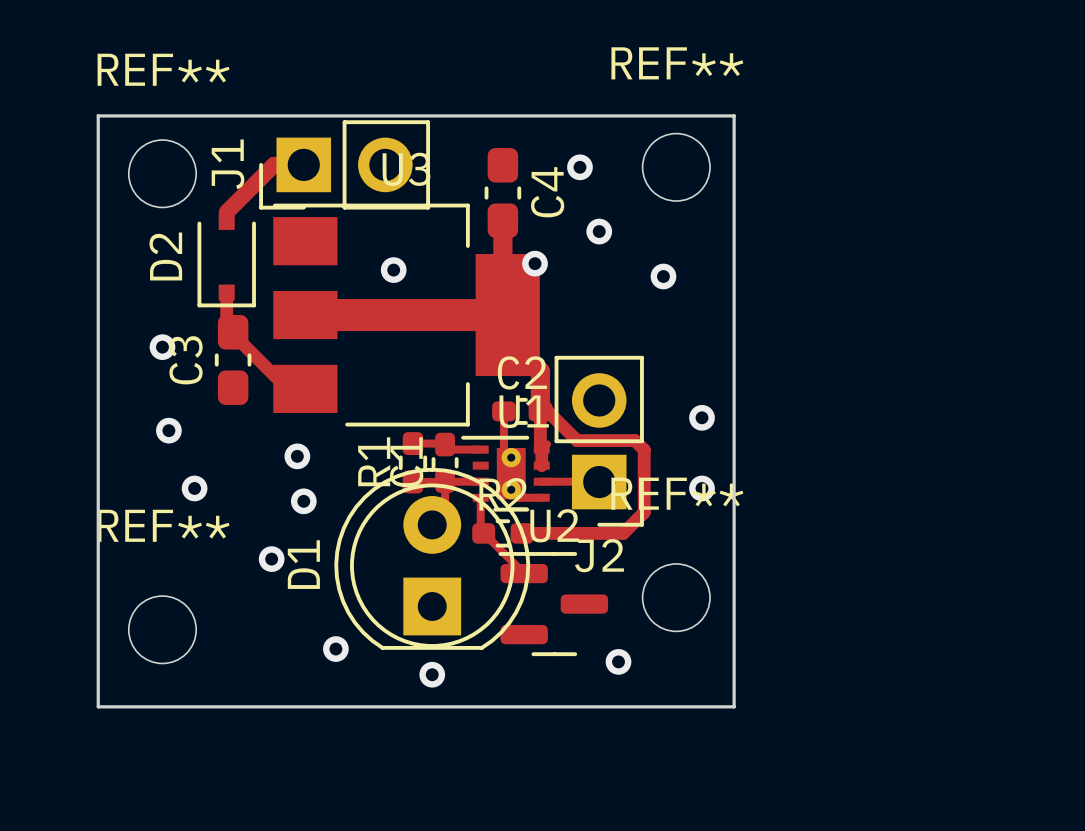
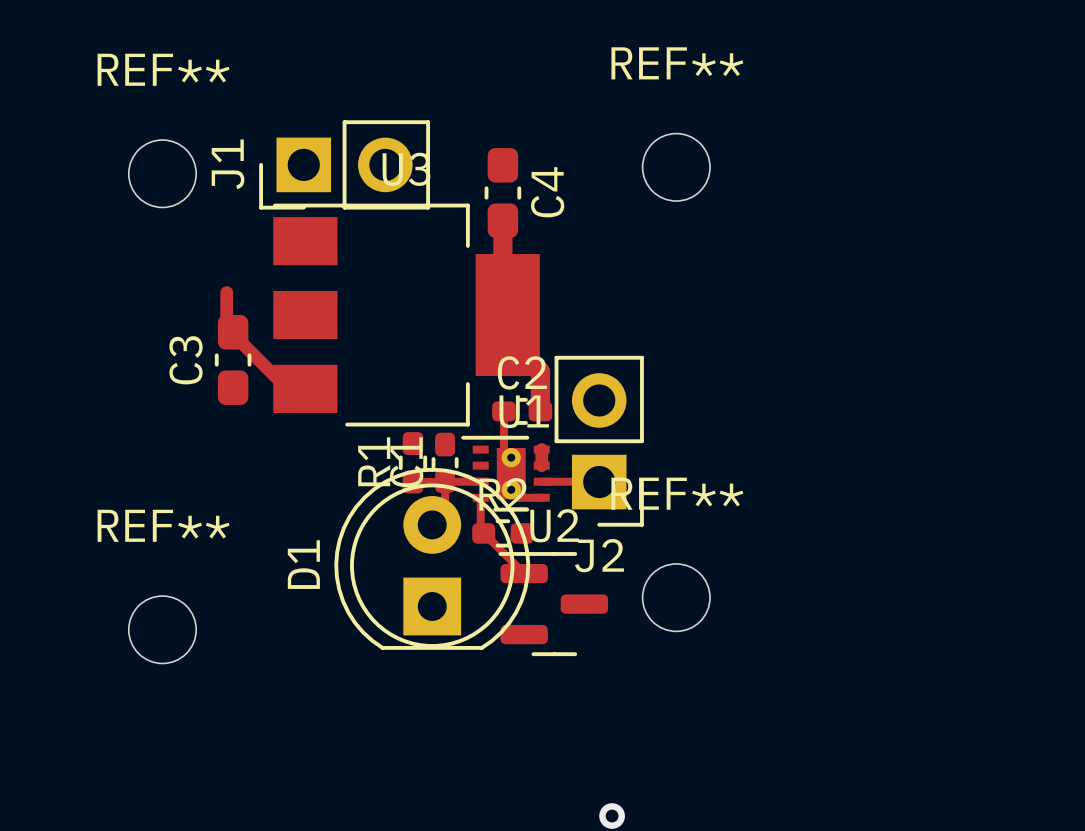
board edge: (98, 115) (98, 706) (734, 706) (734, 115) (98, 115) -> none
track: (303, 164) (274, 164) (226, 212) (226, 221) -> none
via: (579, 167) -> none
via: (599, 231) -> none
D2: (226, 260) -> none
via: (535, 263) -> none
via: (393, 270) -> none
via: (663, 276) -> none
track: (305, 315) (507, 315) -> none
via: (162, 347) -> none
via: (702, 417) -> none
via: (168, 430) -> none
track: (412, 443) (444, 443) (450, 449) (480, 449) -> none
track: (547, 444) (541, 449) (540, 448) (540, 411) (547, 411) (577, 440) (634, 440) (644, 449) (644, 512) (623, 533) (522, 533) -> none
via: (297, 456) -> none
via: (194, 488) -> none
via: (702, 488) -> none
via: (303, 501) -> none
via: (271, 559) -> none
via: (335, 649) -> none
via: (618, 661) -> none
via: (432, 674) -> none
via: none -> (612, 816)

